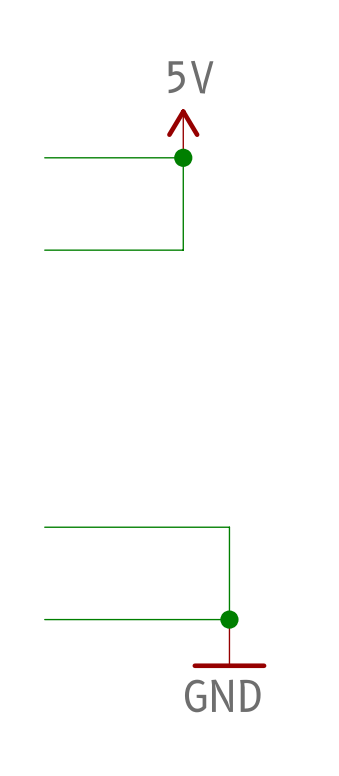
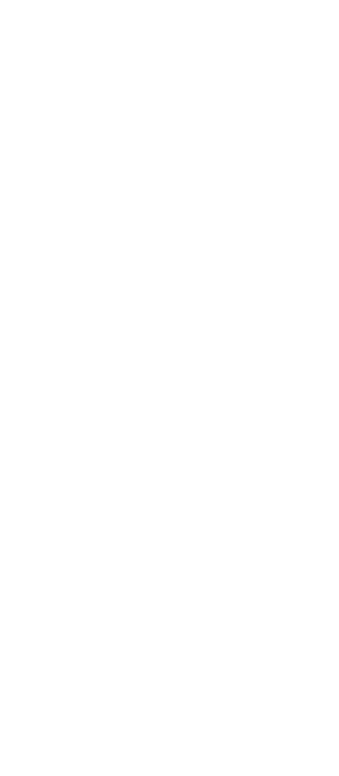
power symbol: 5V (183, 133) -> none
wire: (44, 157) (183, 157) (183, 250) (44, 250) -> none
junction: (183, 157) -> none
wire: (44, 527) (229, 527) (229, 619) (44, 619) -> none
junction: (229, 619) -> none
power symbol: GND (229, 643) -> none

